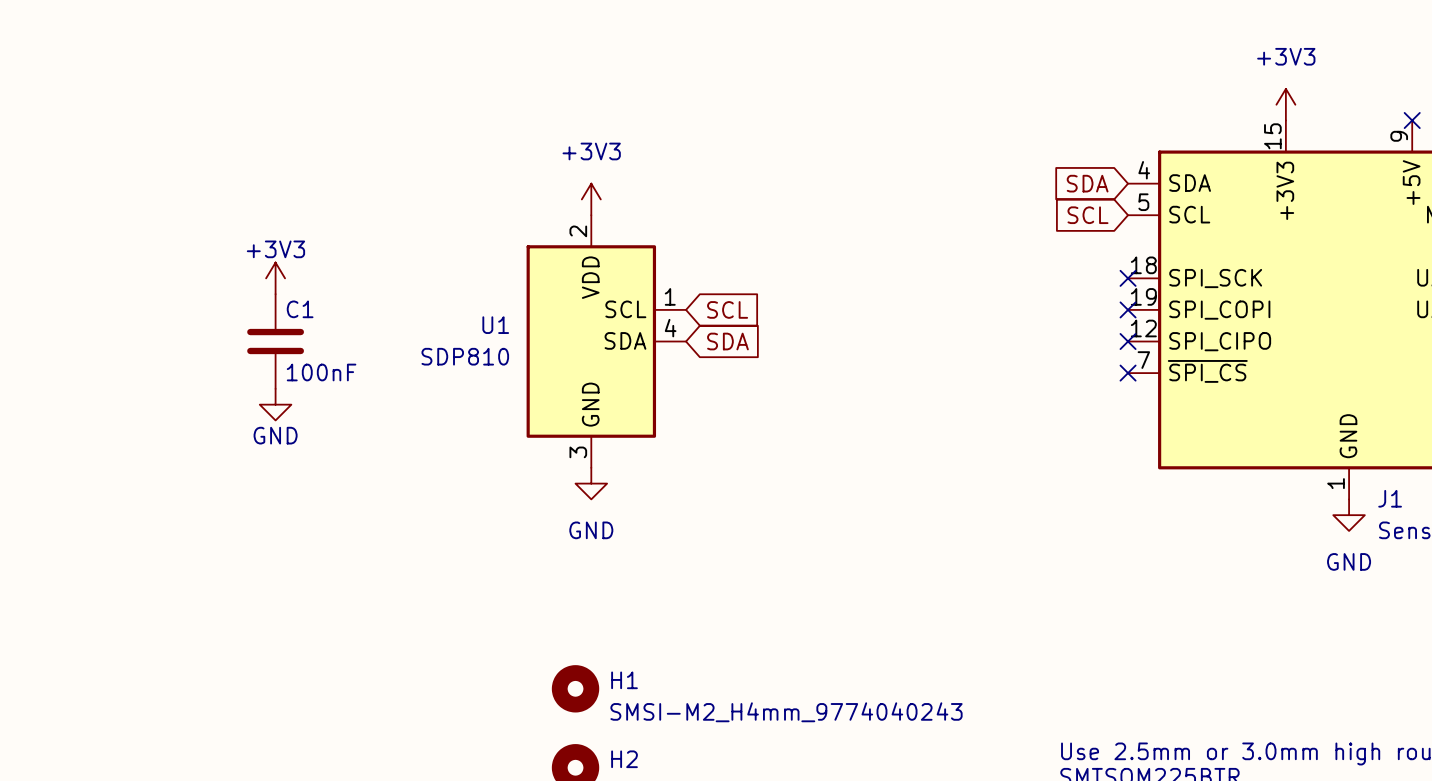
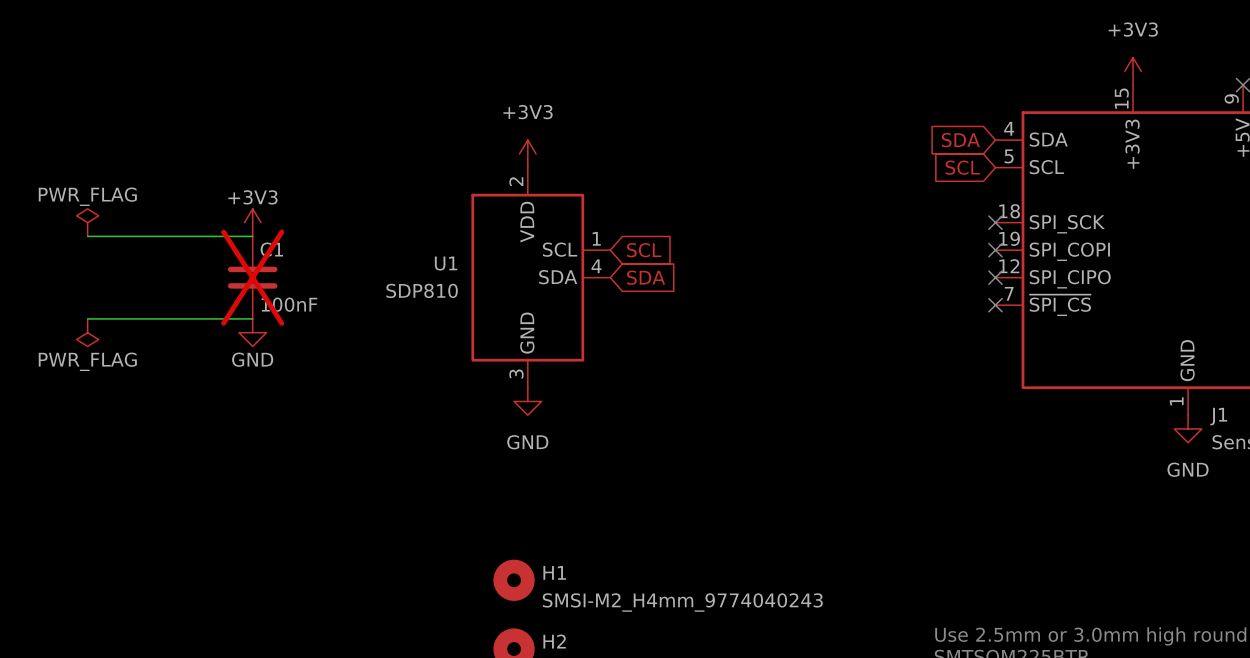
power symbol: none -> PWR_FLAG (87, 222)
wire: none -> (87, 236) (252, 236)
C1 do-not-place cross: none -> (252, 277)
wire: none -> (87, 318) (252, 318)
power symbol: none -> PWR_FLAG (87, 332)

